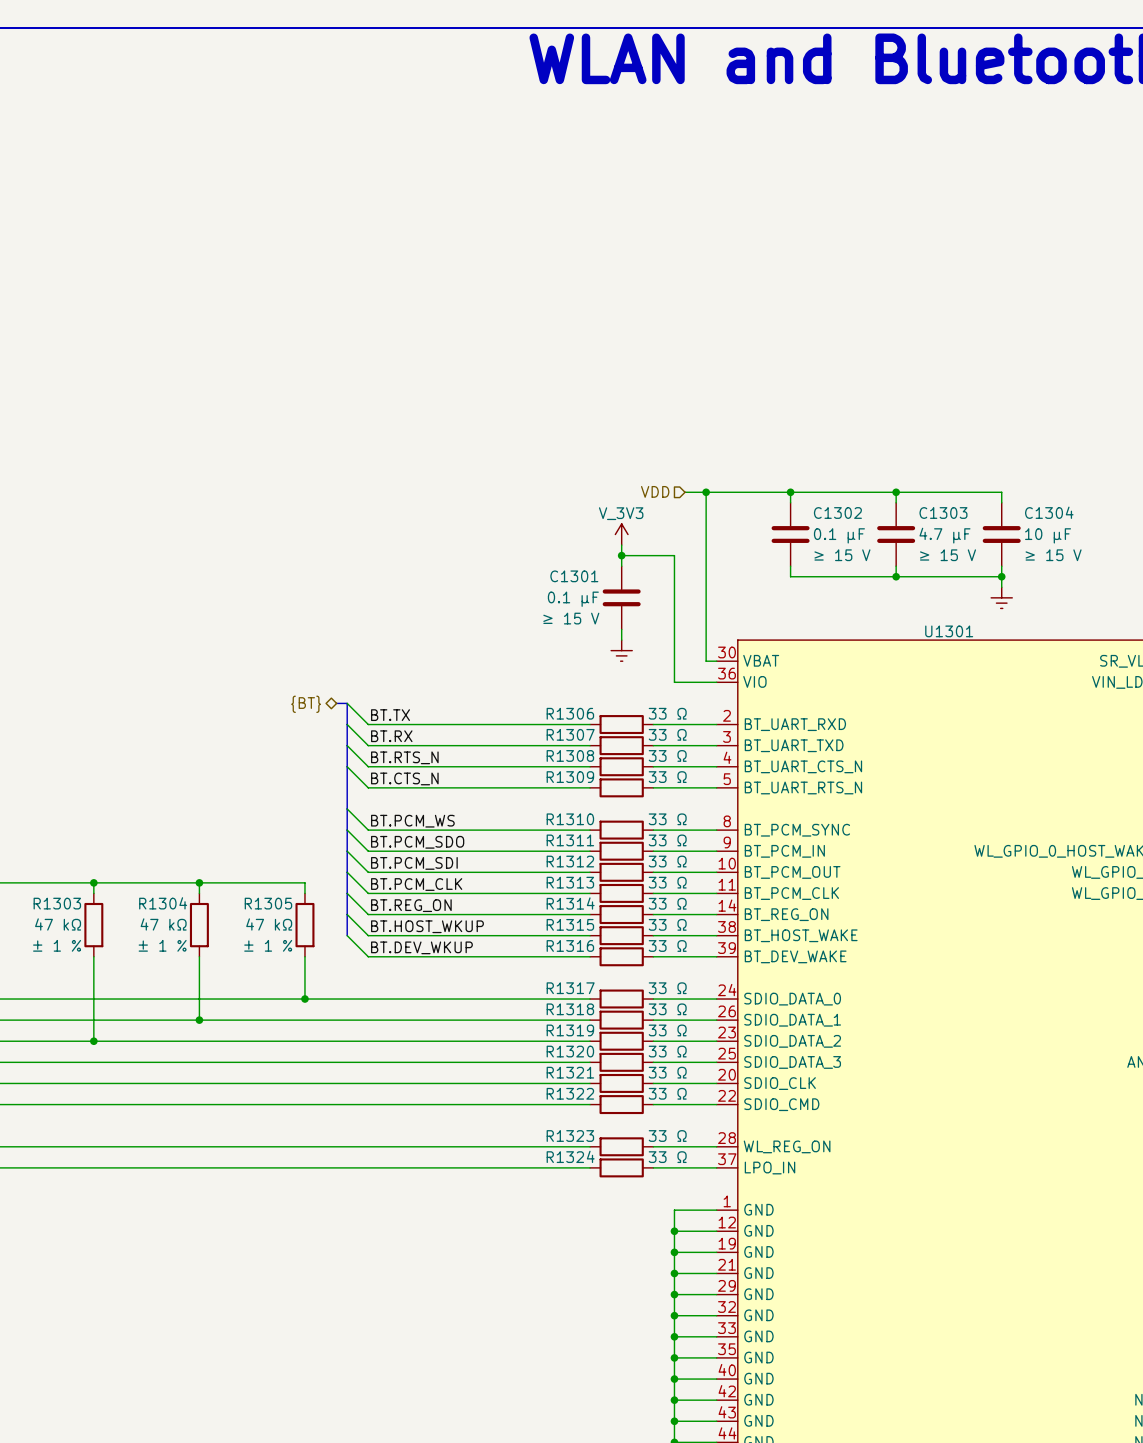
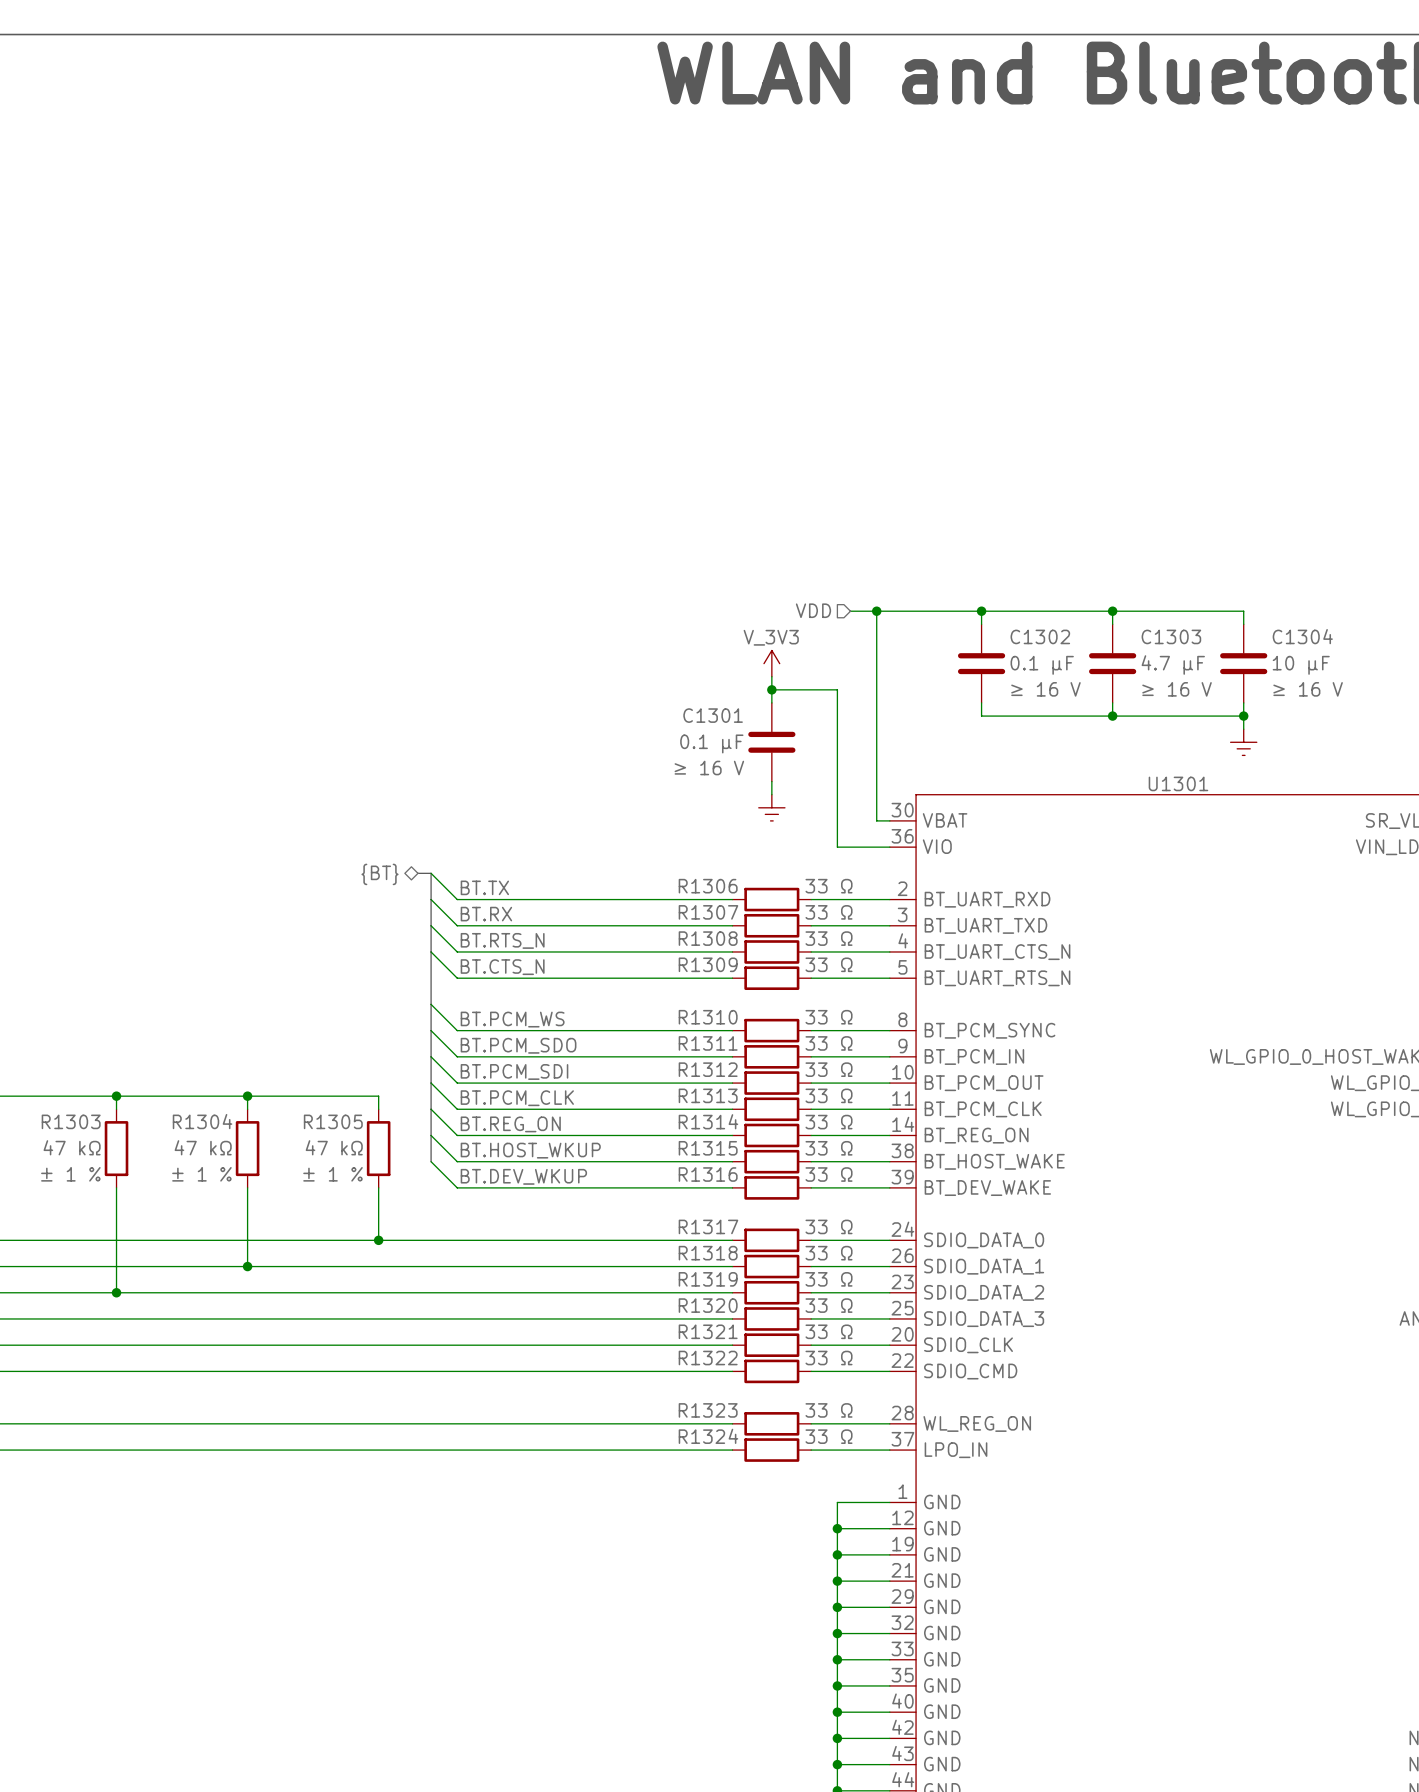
C1302 text: ≥ 15 V (842, 555) -> ≥ 16 V (1045, 689)
C1303 text: ≥ 15 V (948, 555) -> ≥ 16 V (1177, 689)
C1304 text: ≥ 15 V (1053, 555) -> ≥ 16 V (1308, 689)
C1301 text: ≥ 15 V (571, 618) -> ≥ 16 V (709, 768)

